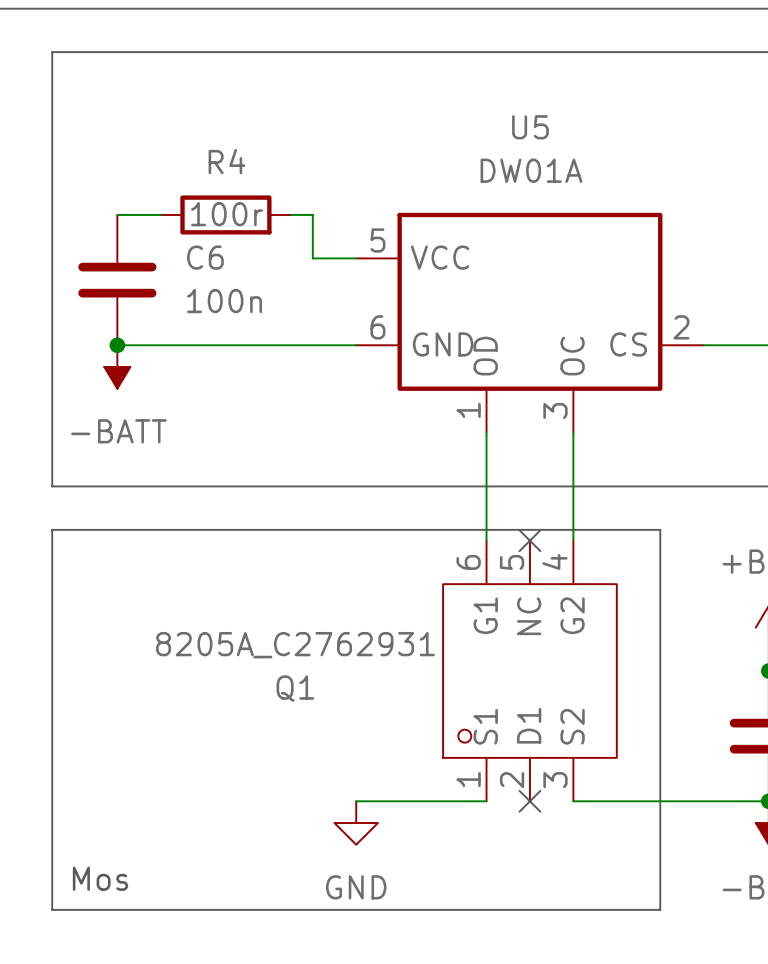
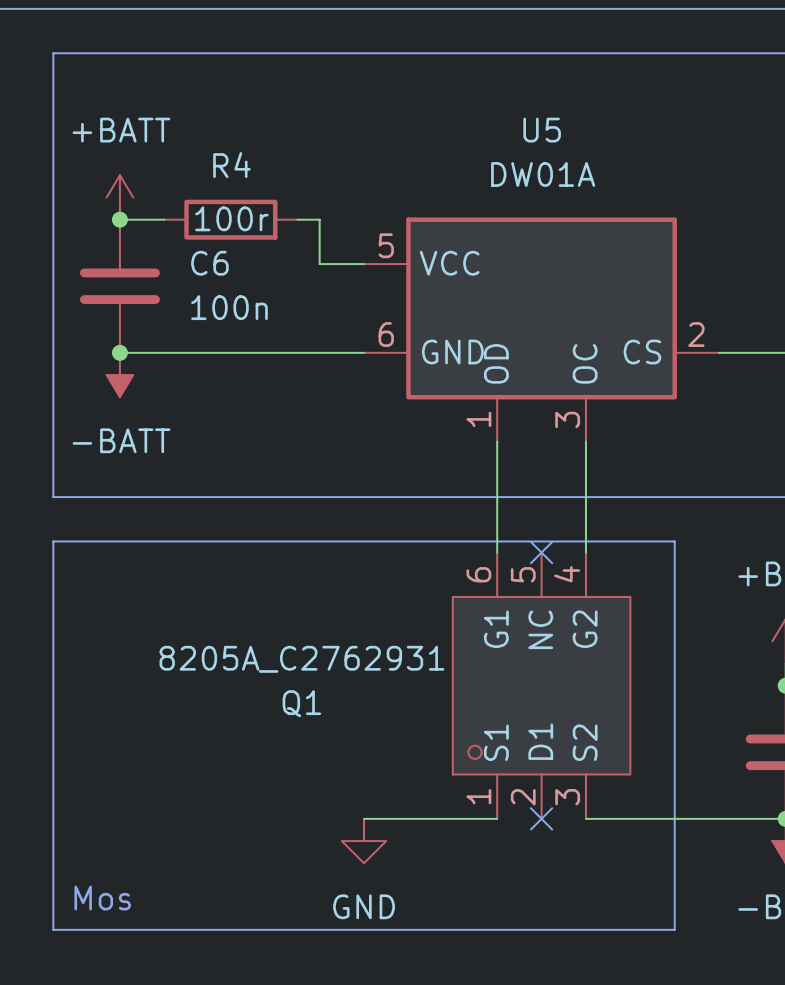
power symbol: none -> +BATT (119, 197)
junction: none -> (119, 219)

